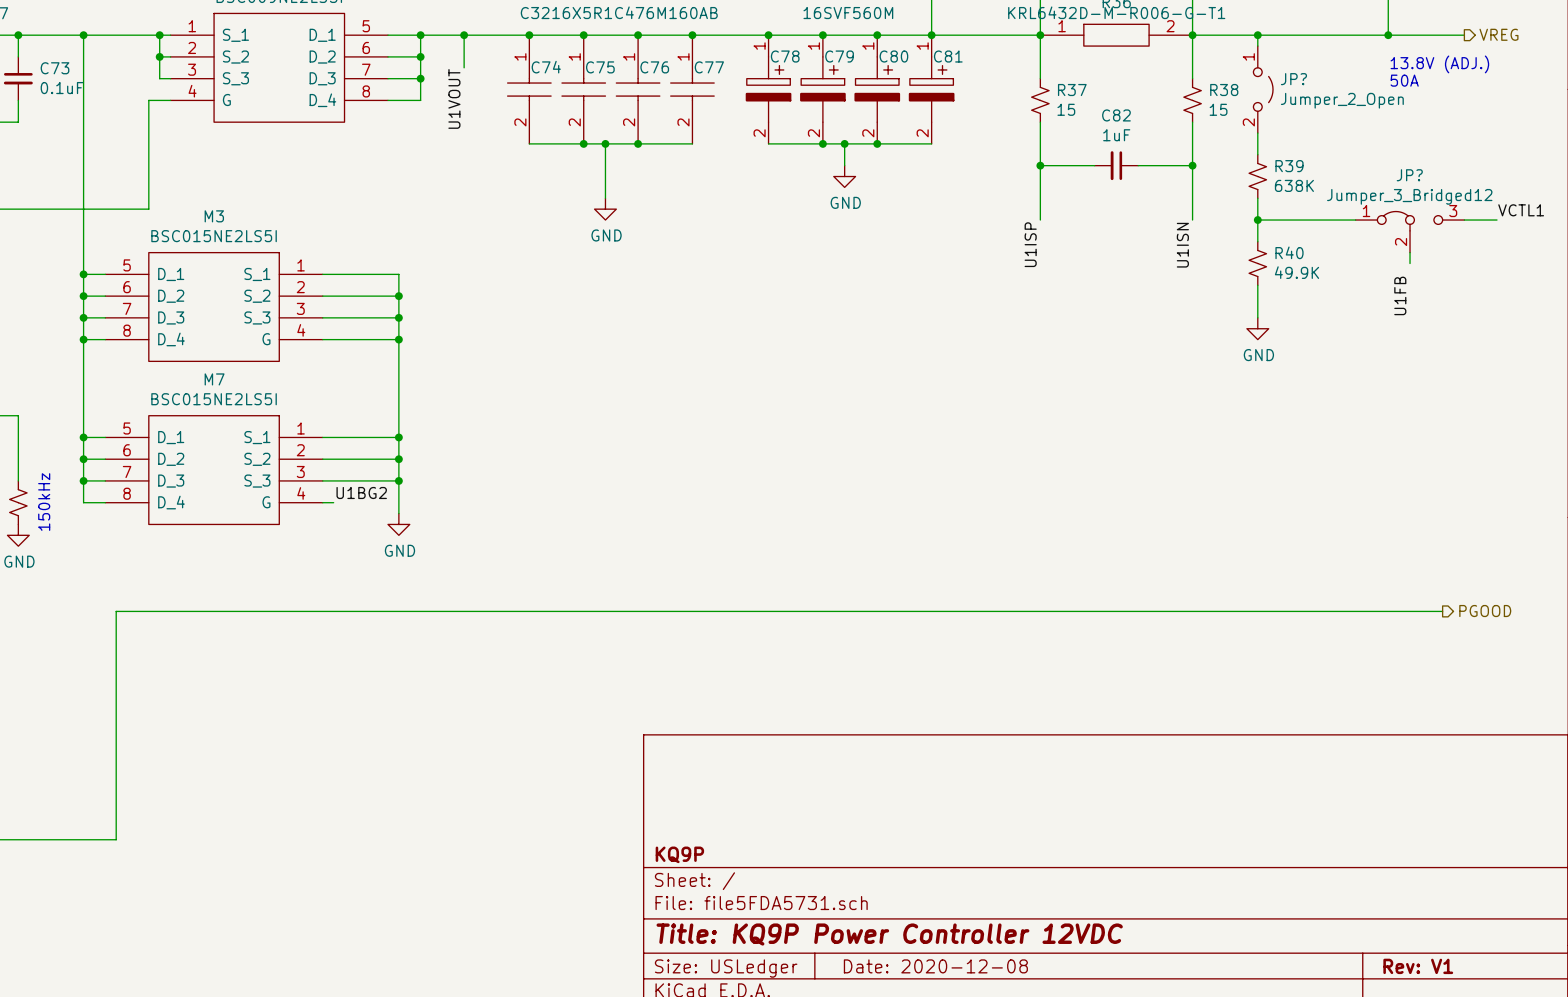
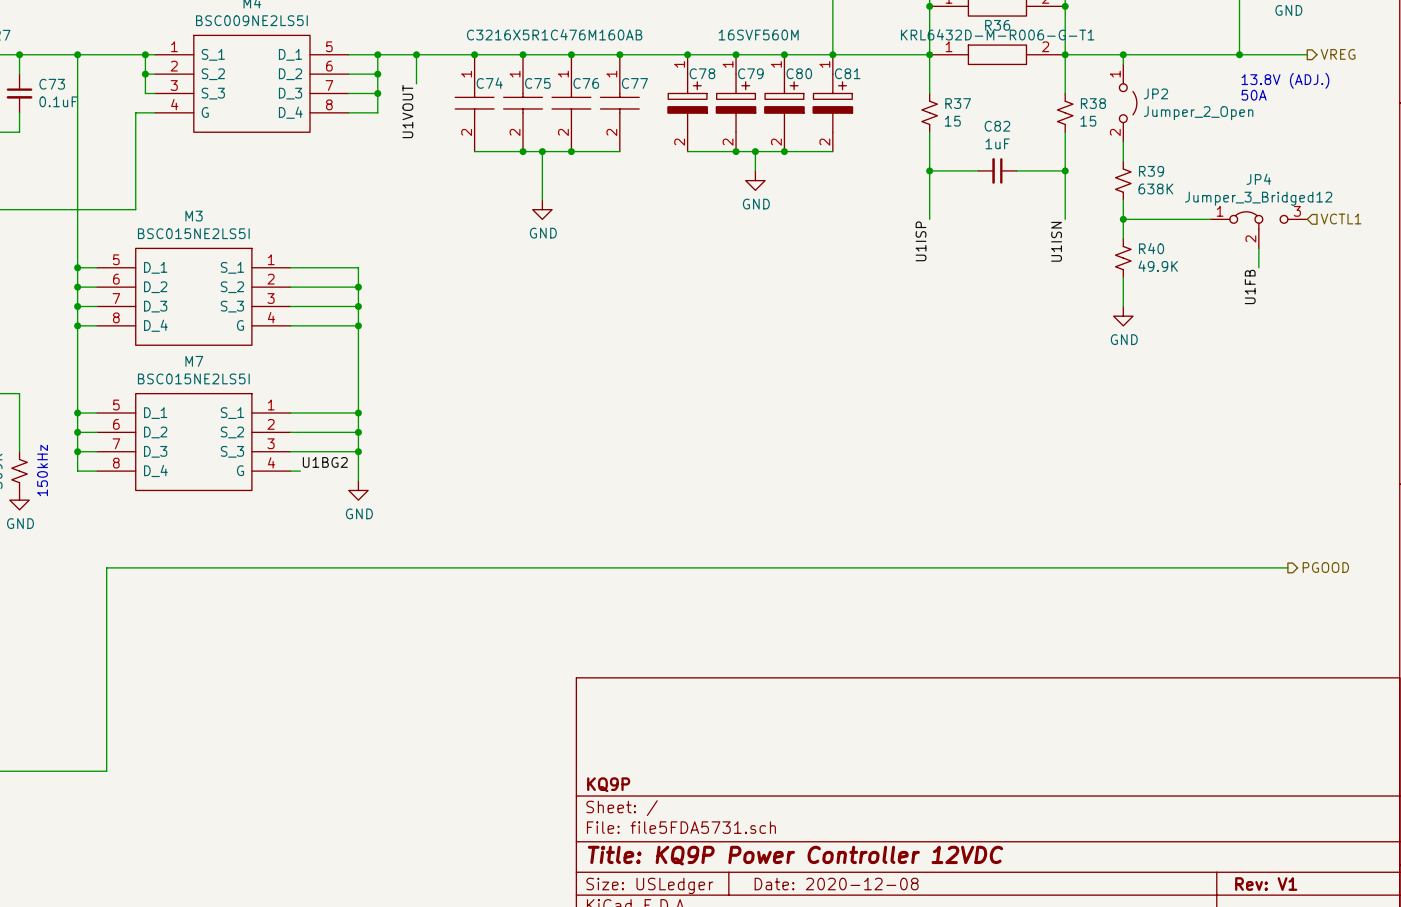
JP? name: JP? (1293, 79) -> JP2 (1155, 93)
JP? name: JP? (1409, 175) -> JP4 (1258, 179)
label: VCTL1 (1521, 210) -> none
hierarchical label: none -> VCTL1 (1341, 218)
wire: (1464, 220) (1496, 220) -> none
wire: none -> (1258, 258) (1258, 267)

